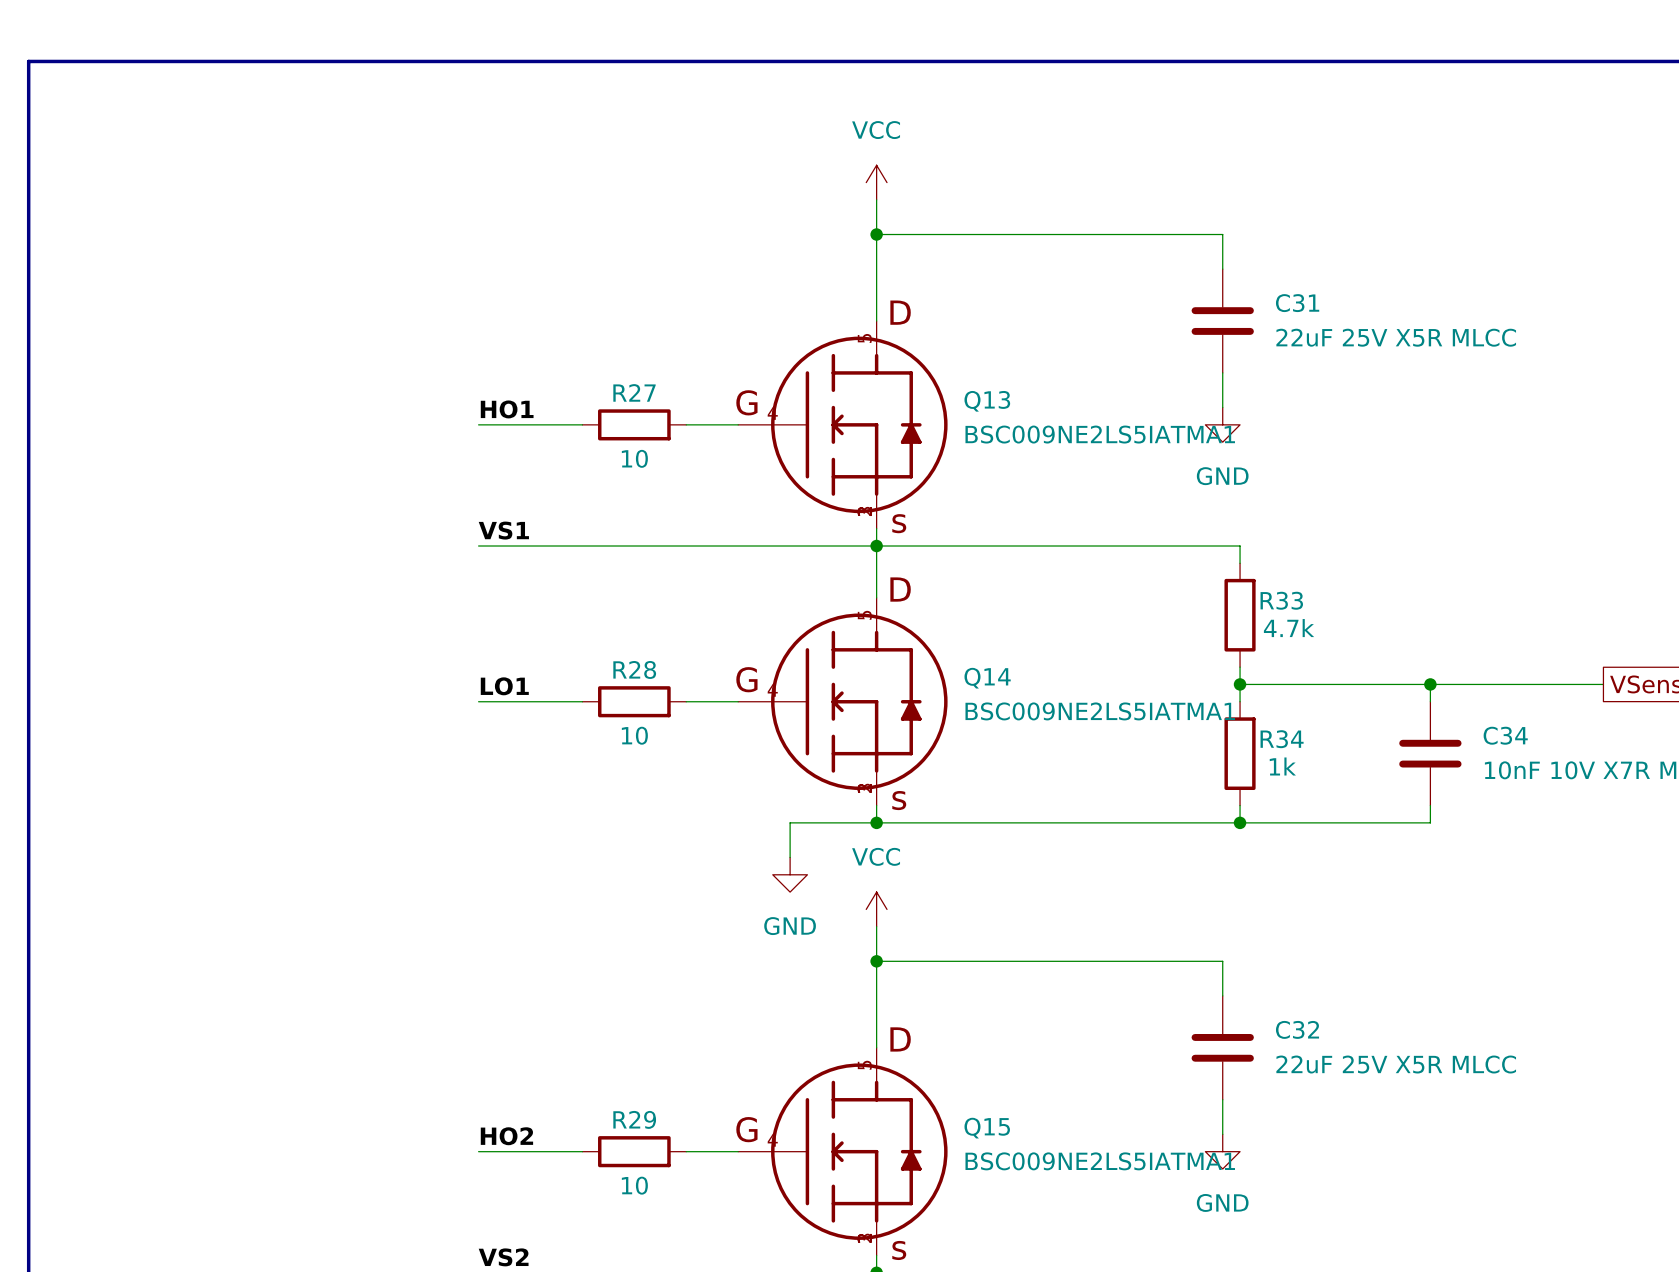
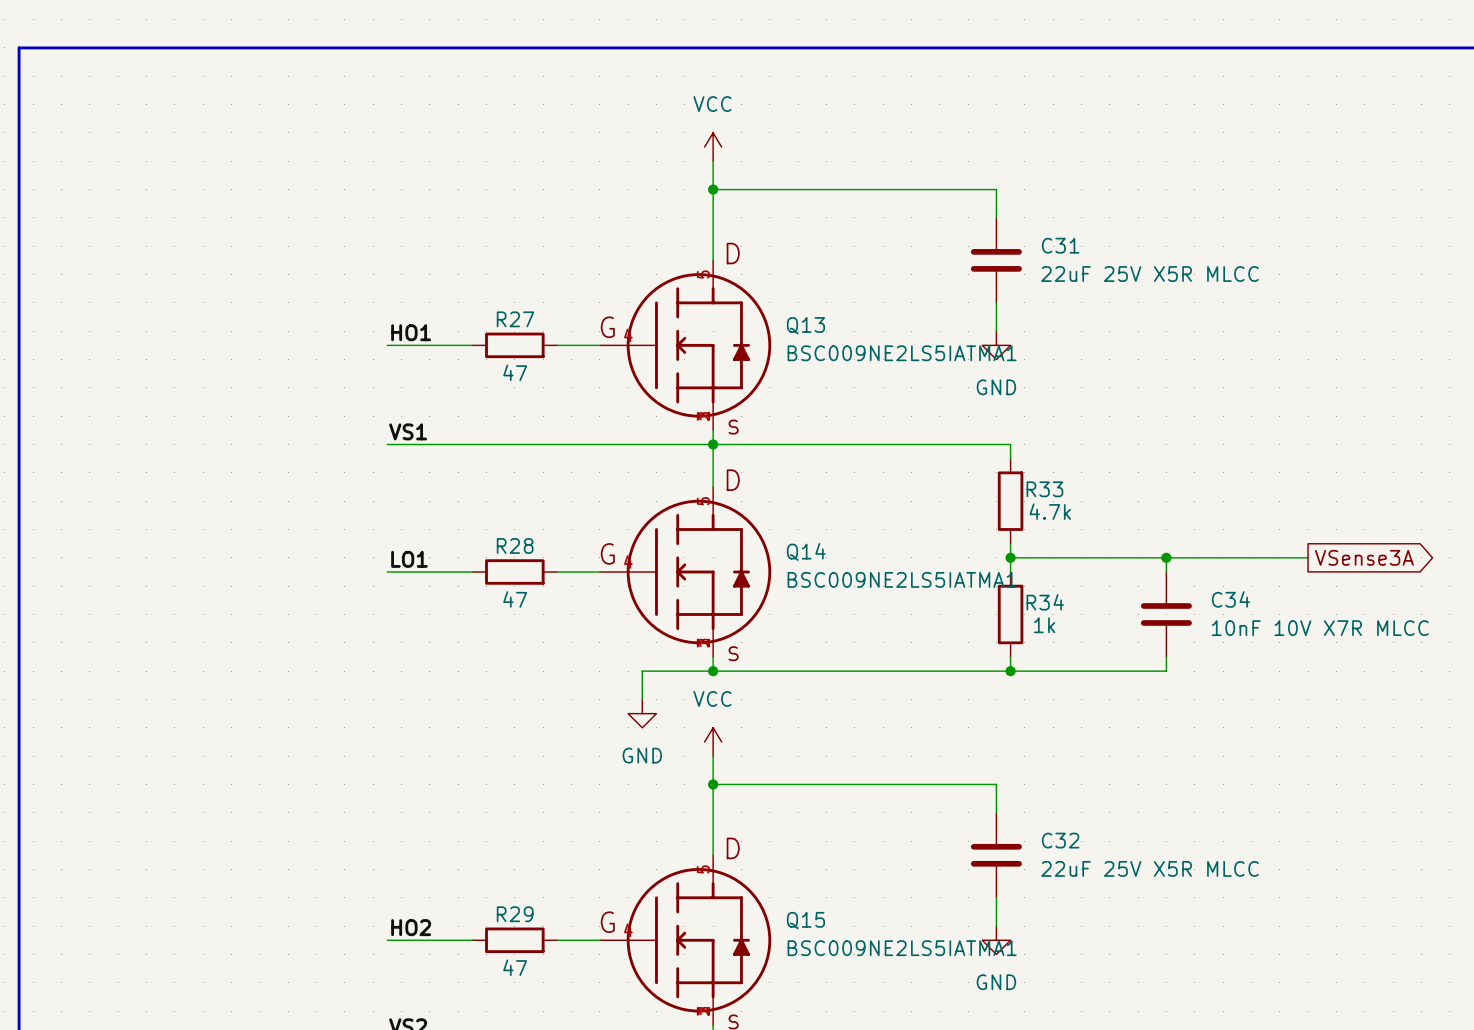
R27 value: 10 (634, 458) -> 47 (515, 372)
R28 value: 10 (634, 735) -> 47 (515, 599)
R29 value: 10 (634, 1185) -> 47 (515, 967)

